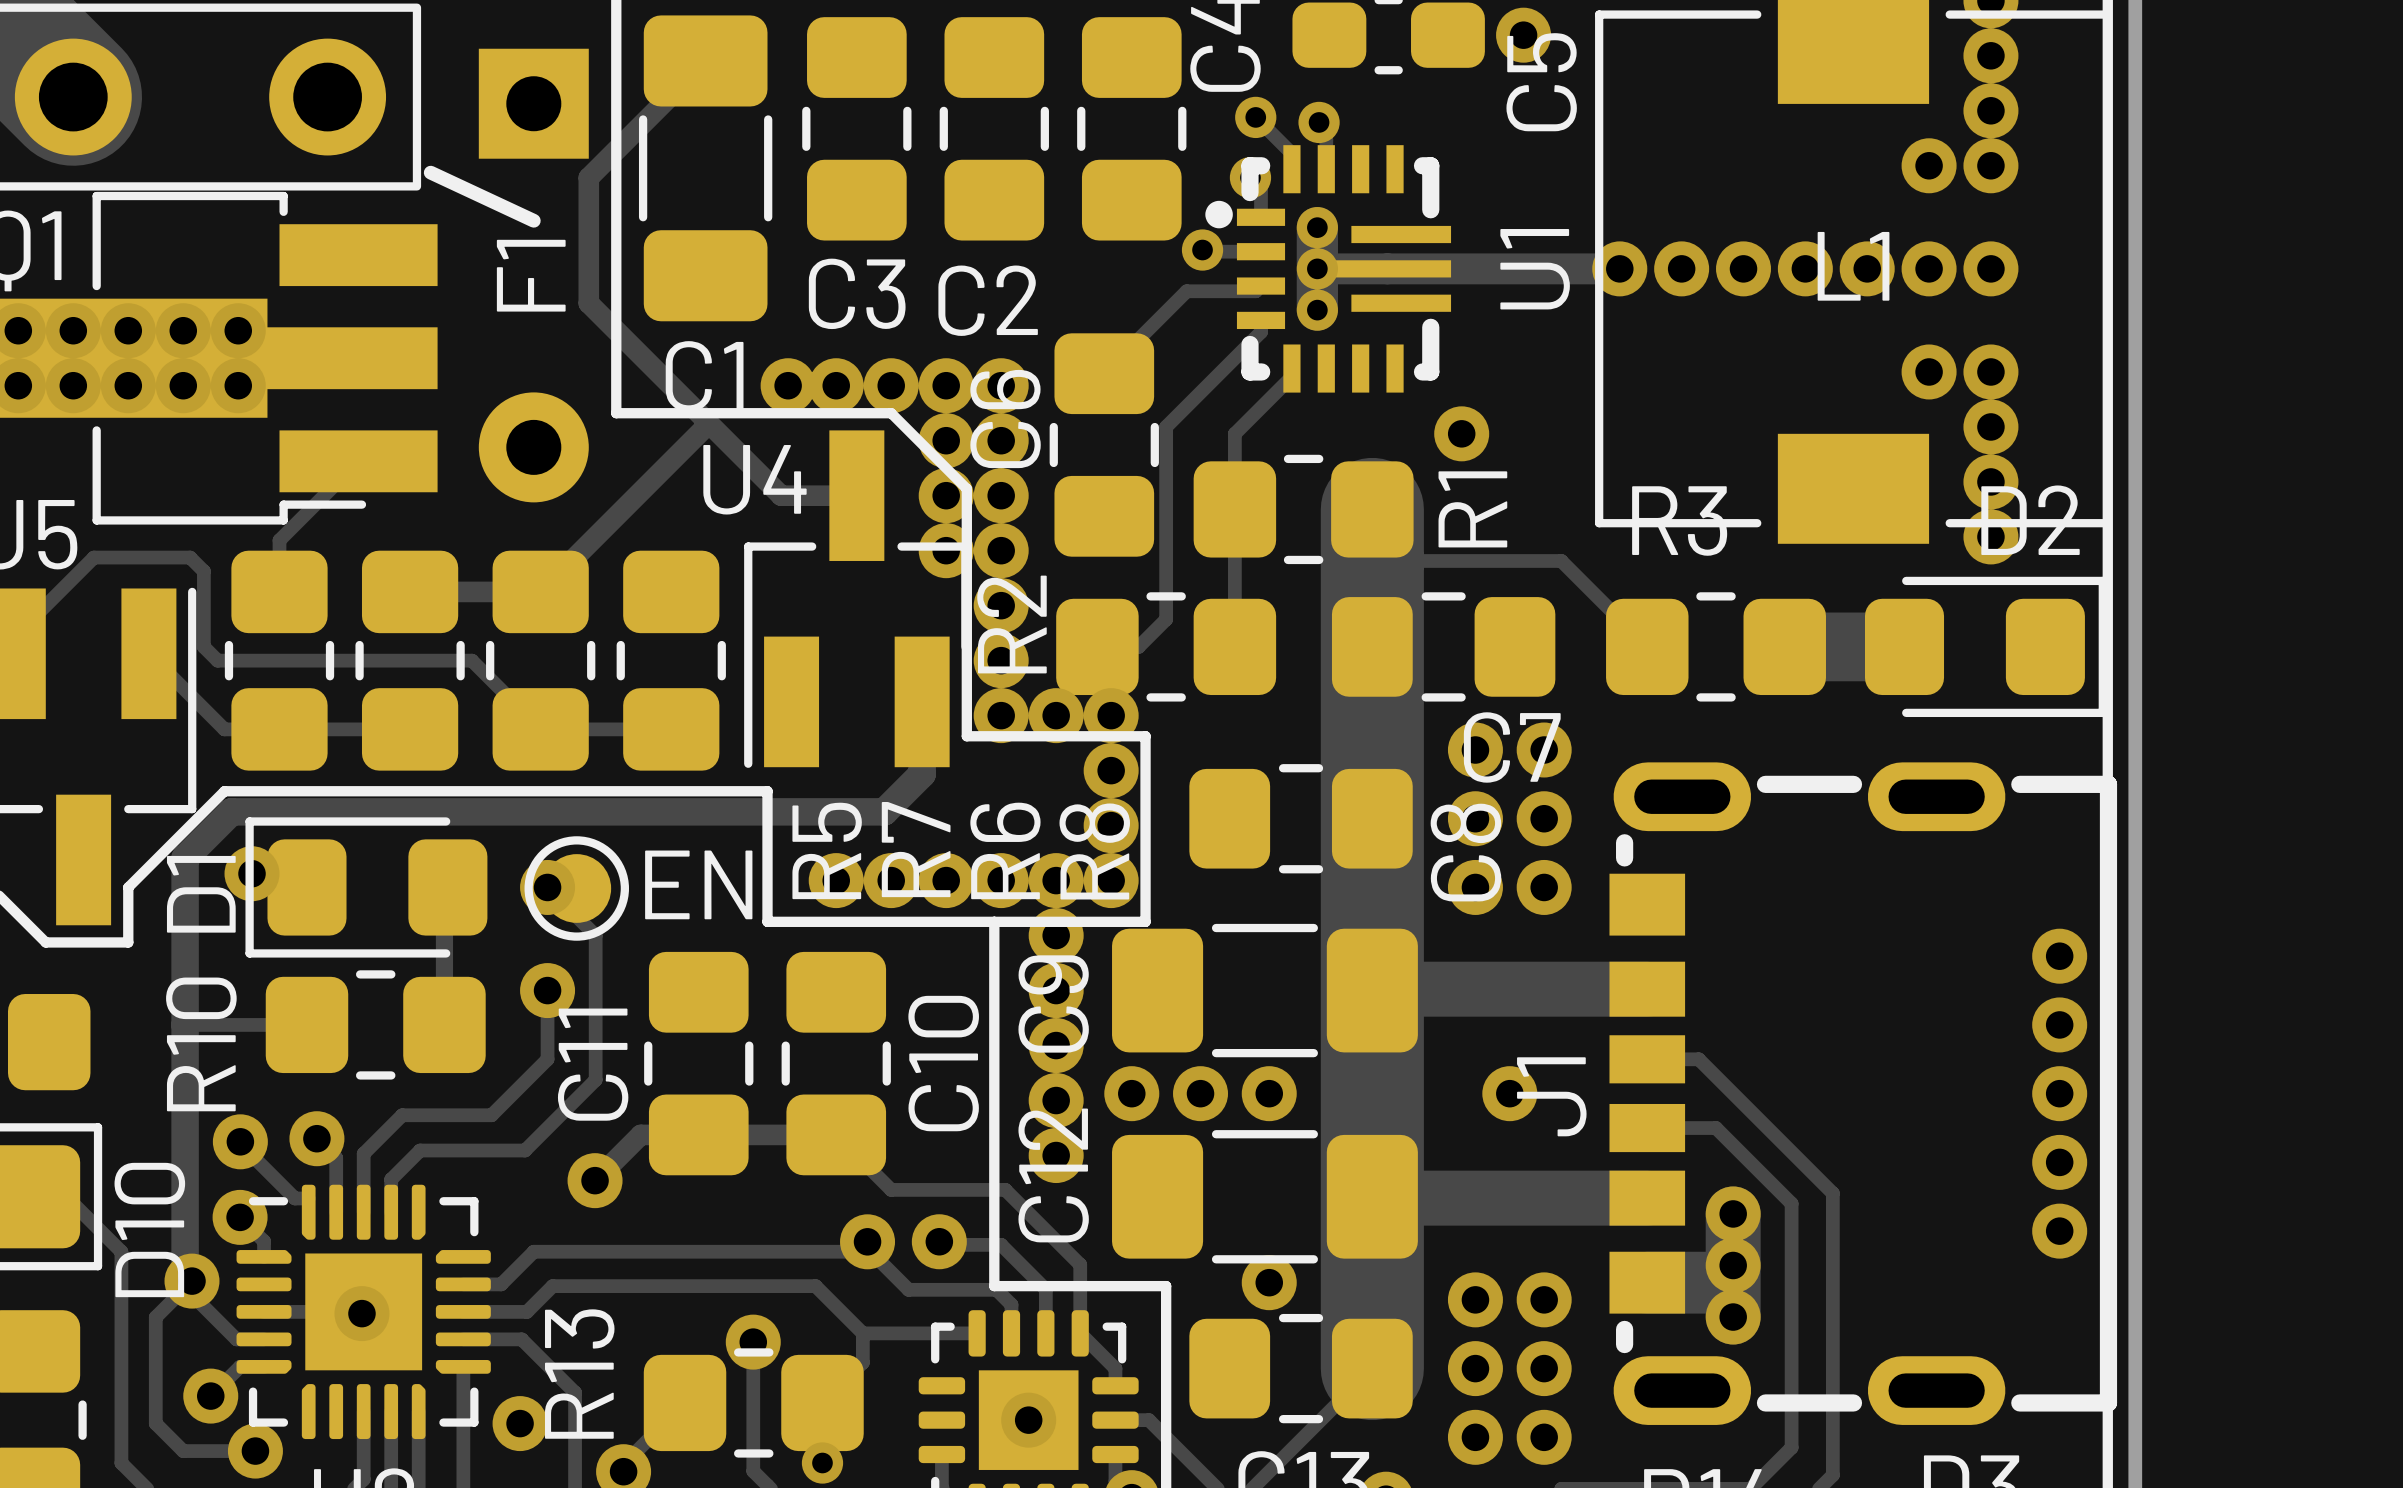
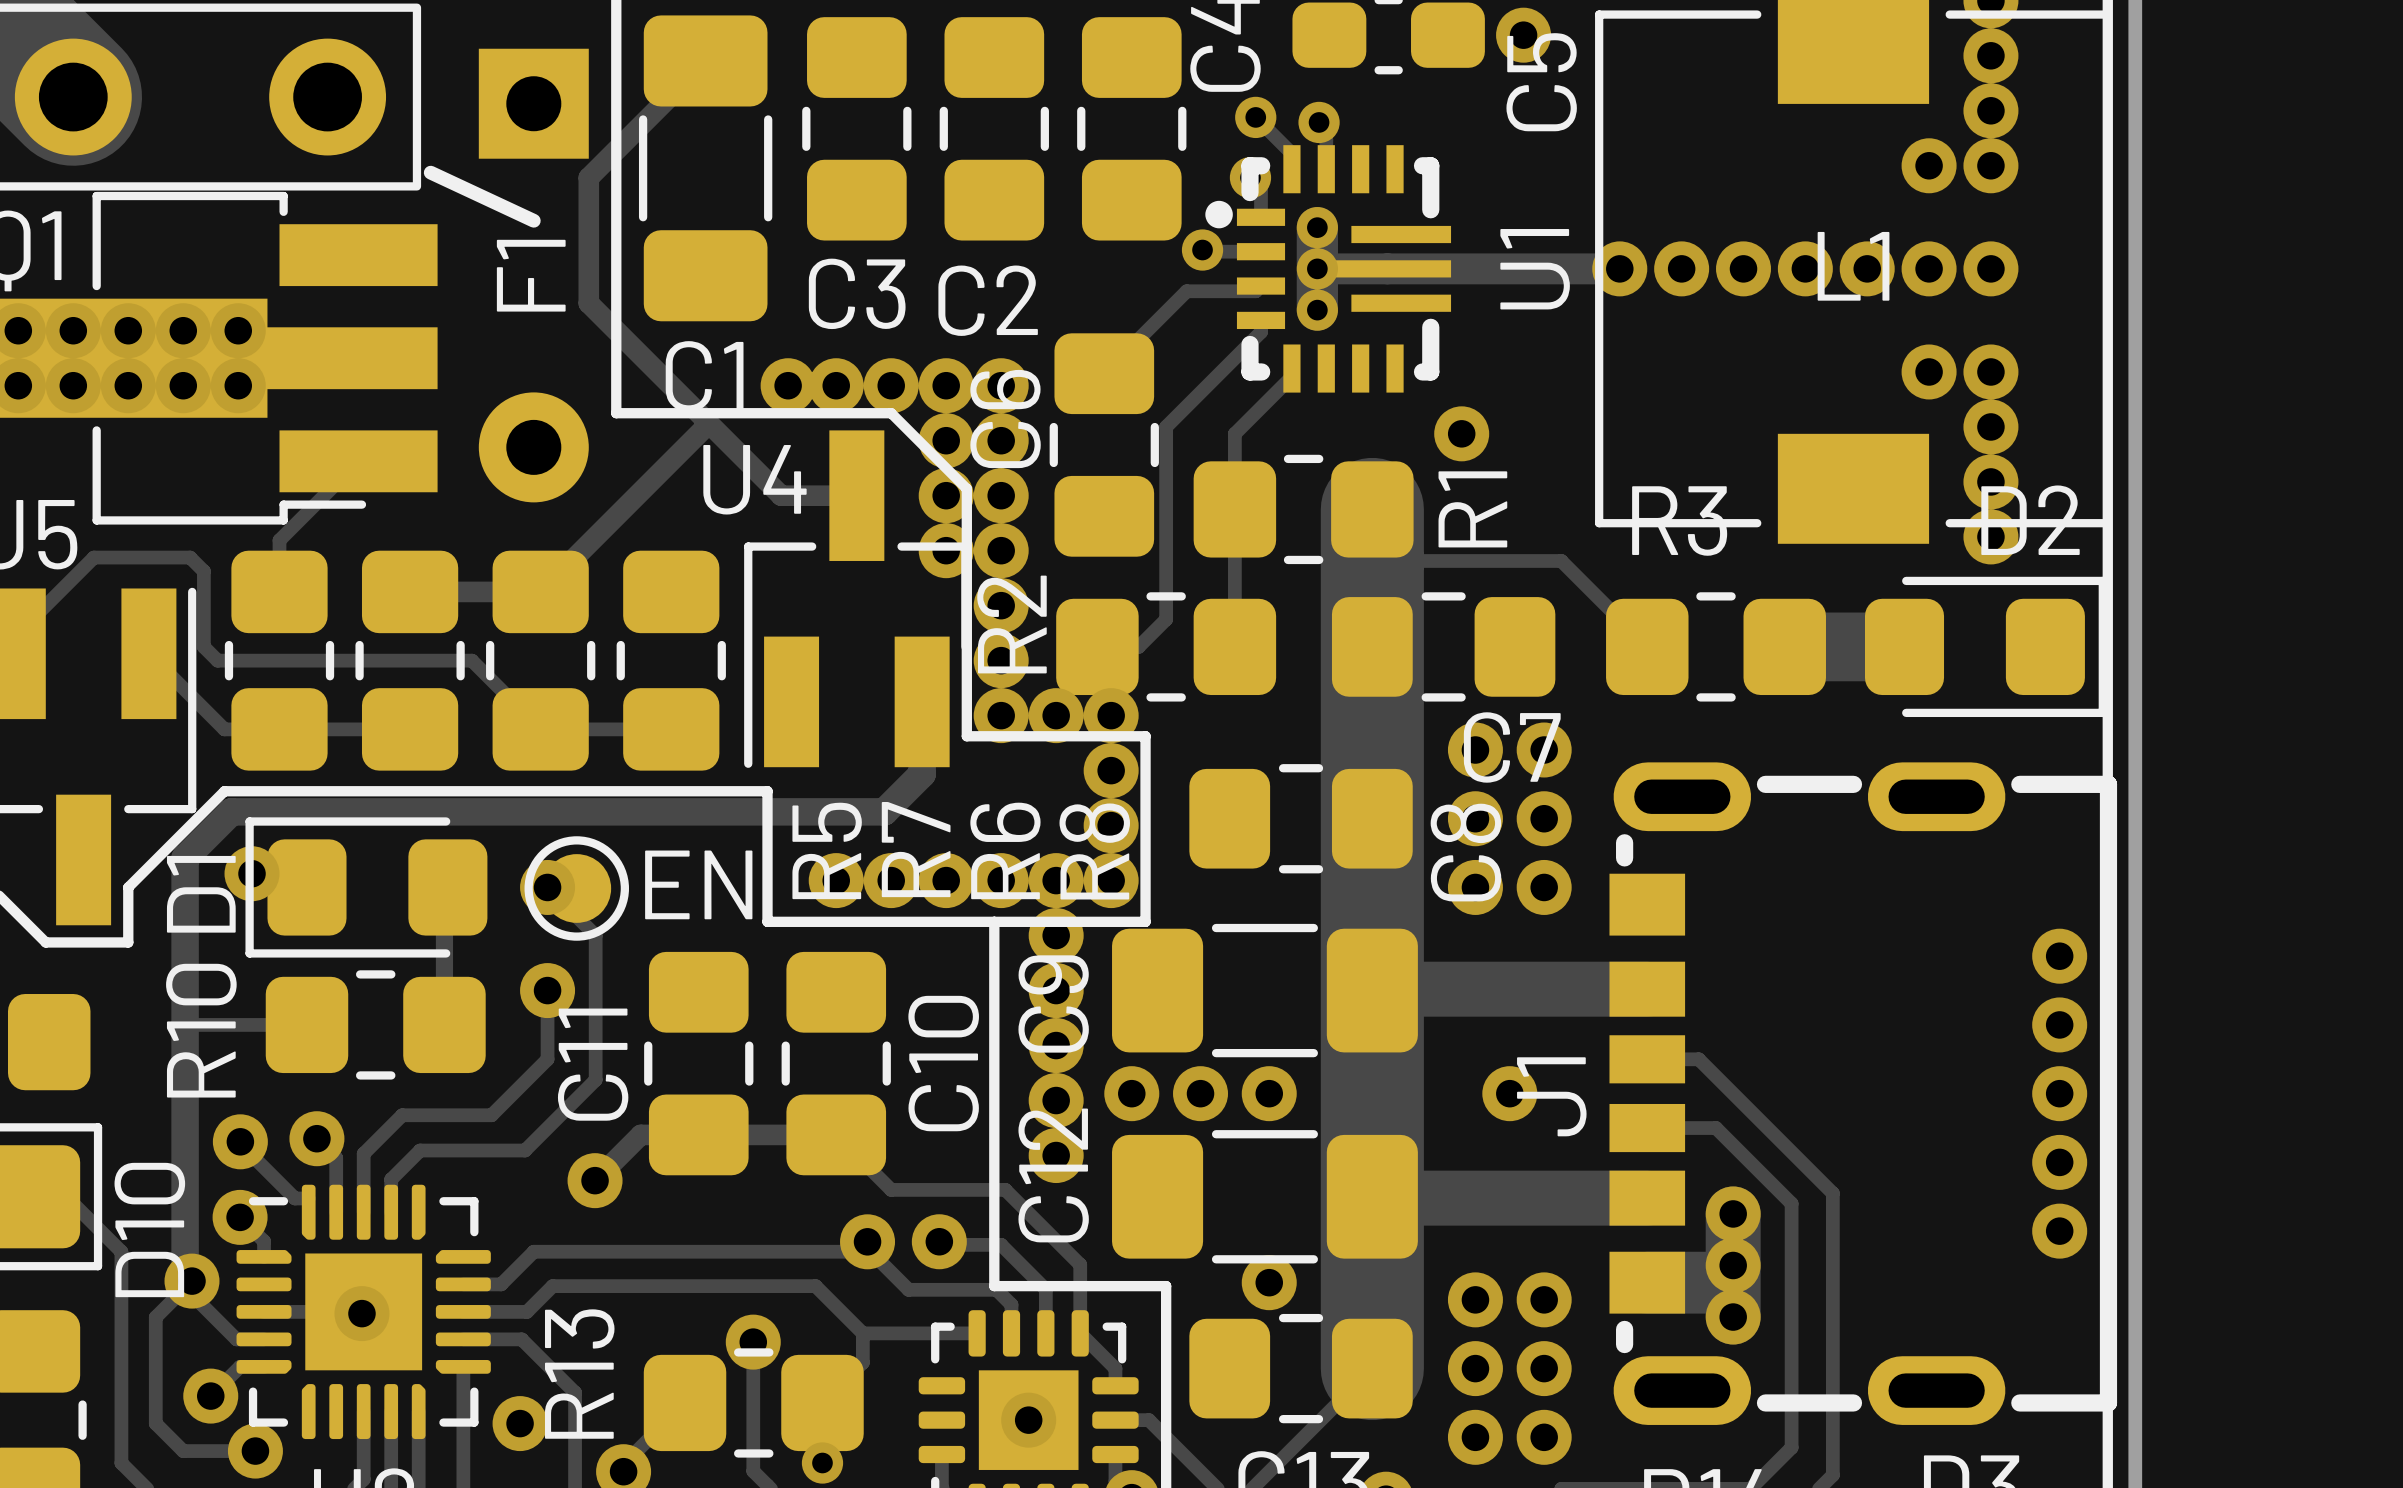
R10 name position: R10 (201, 1044) -> R10 (201, 1030)

